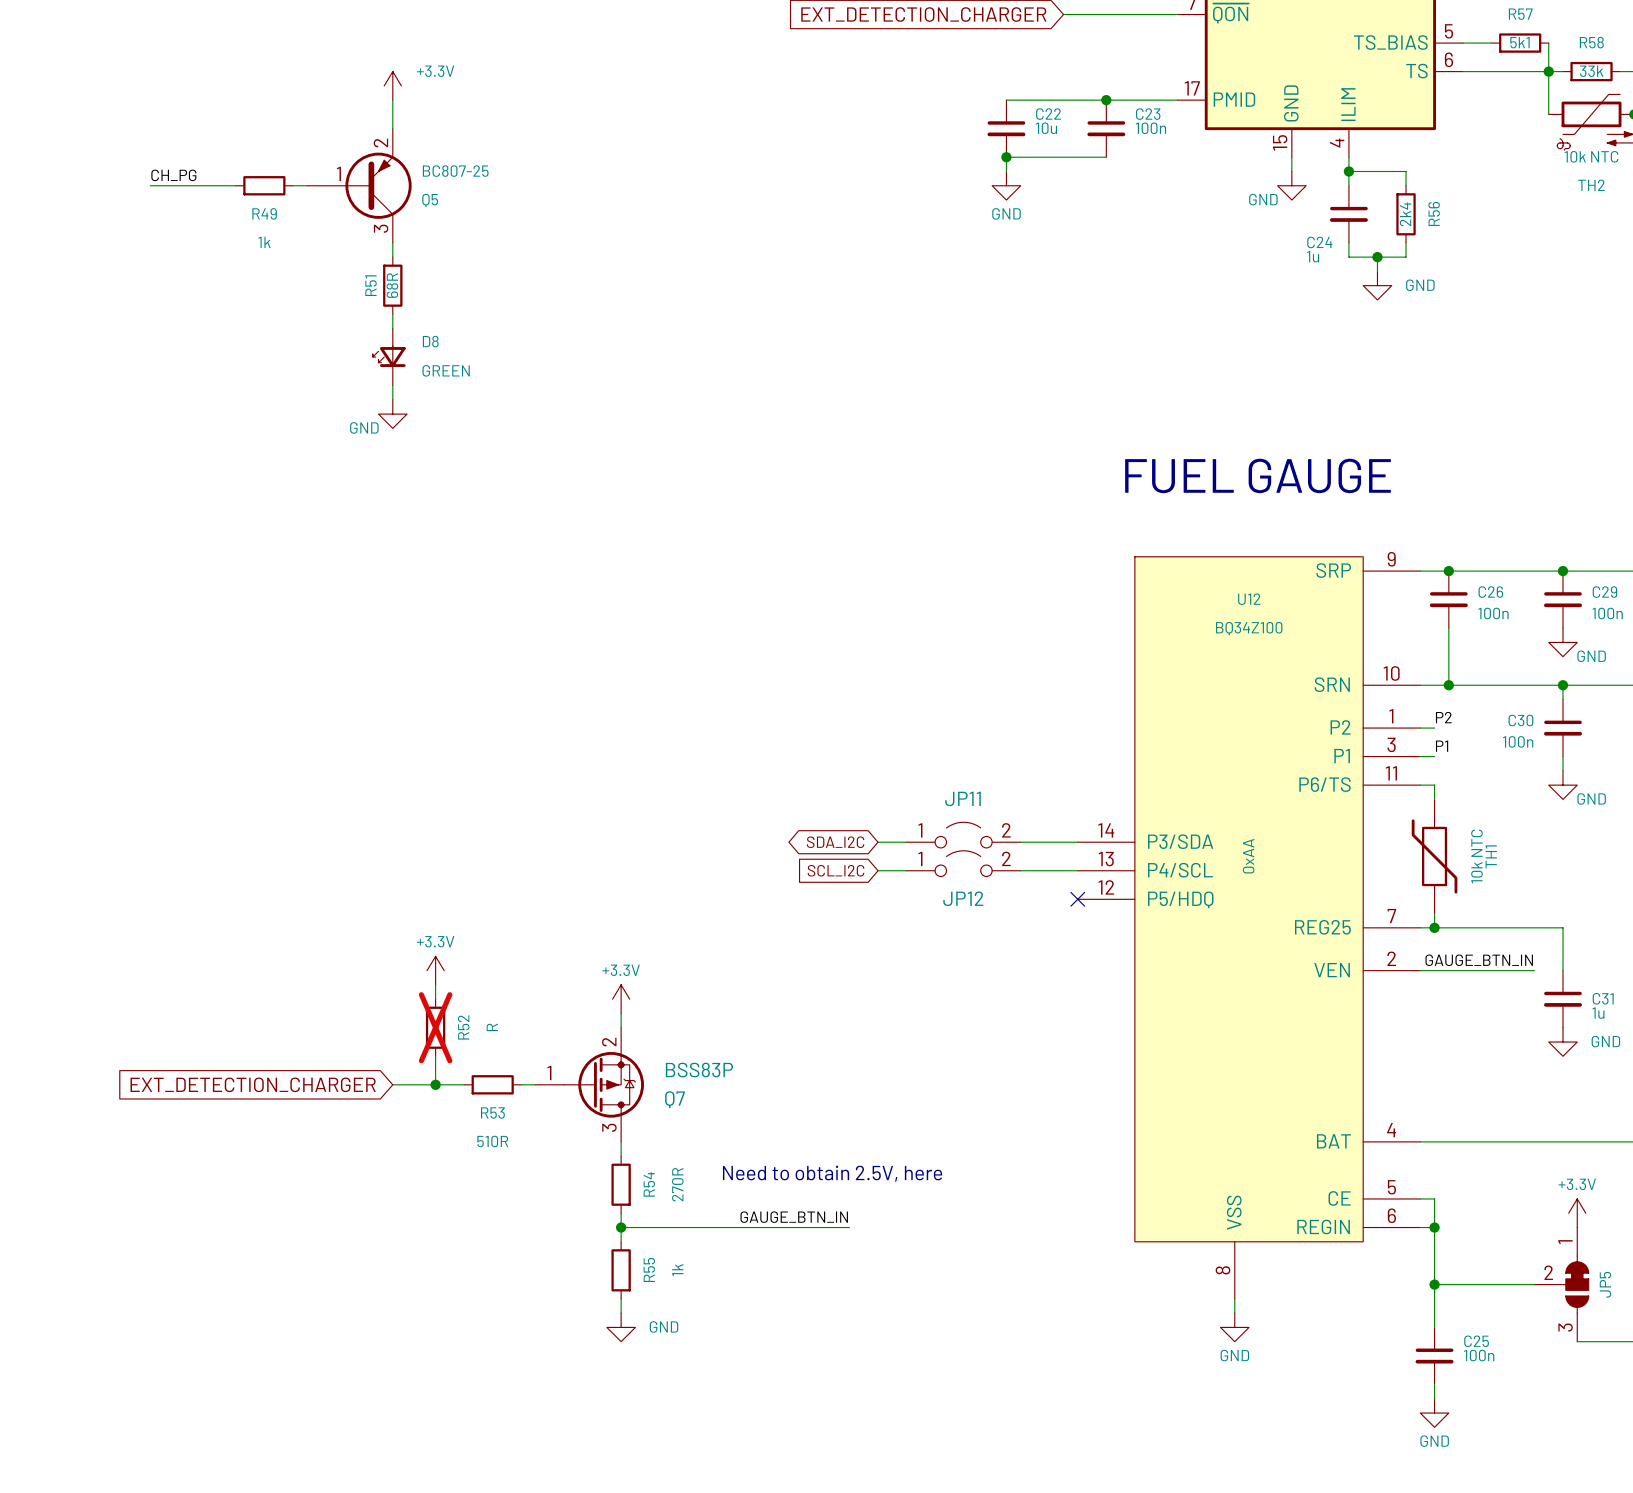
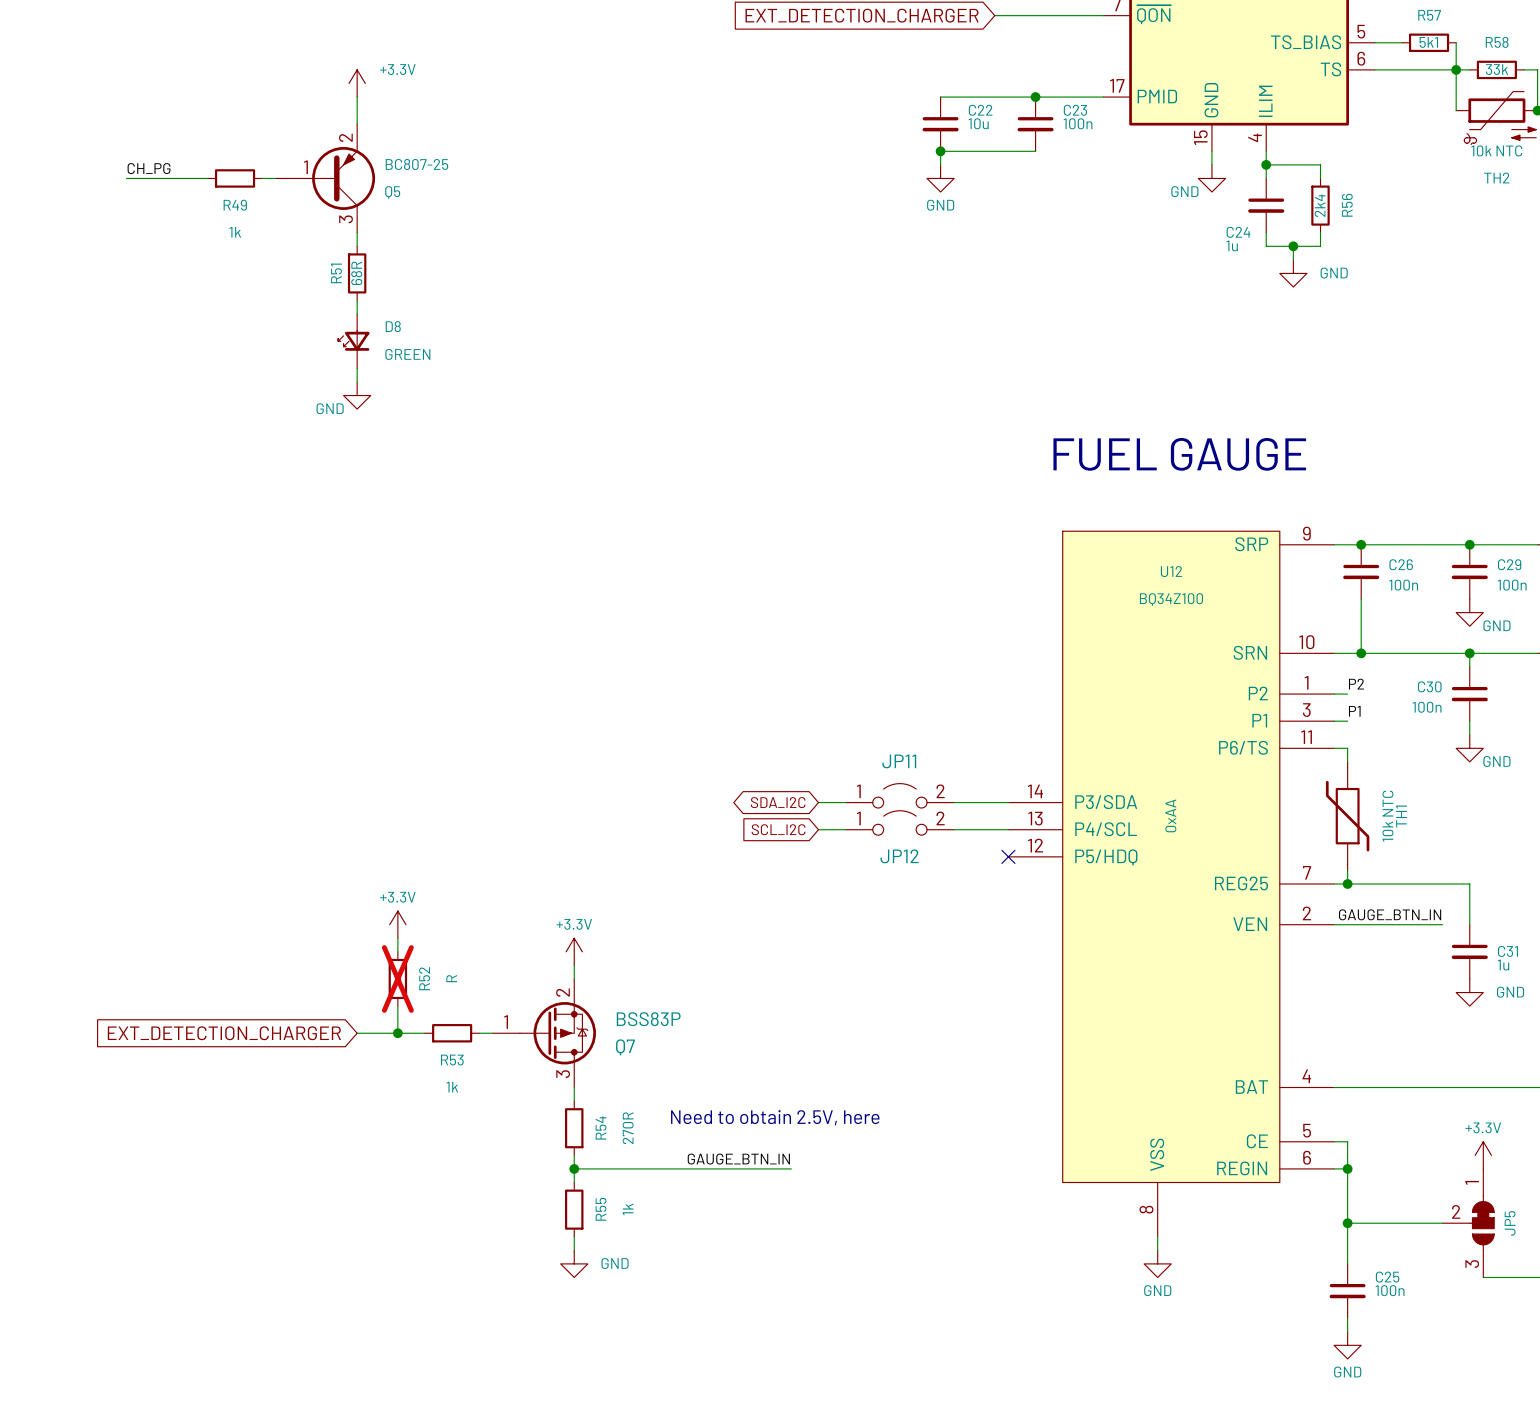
R53 value: 510R (492, 1141) -> 1k (452, 1087)

